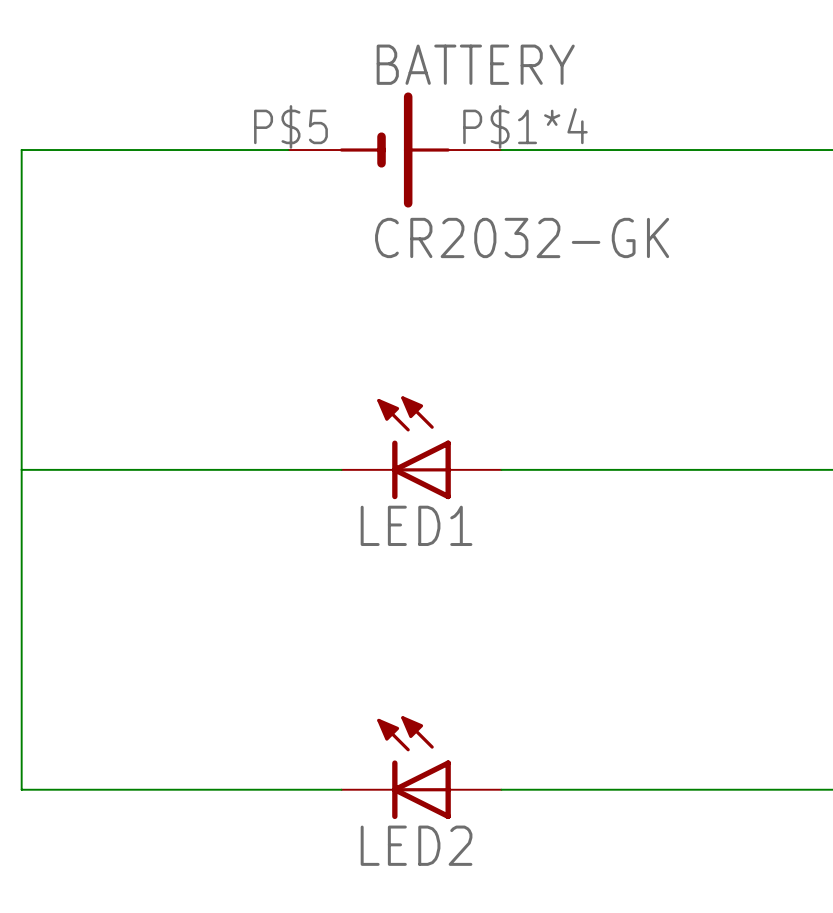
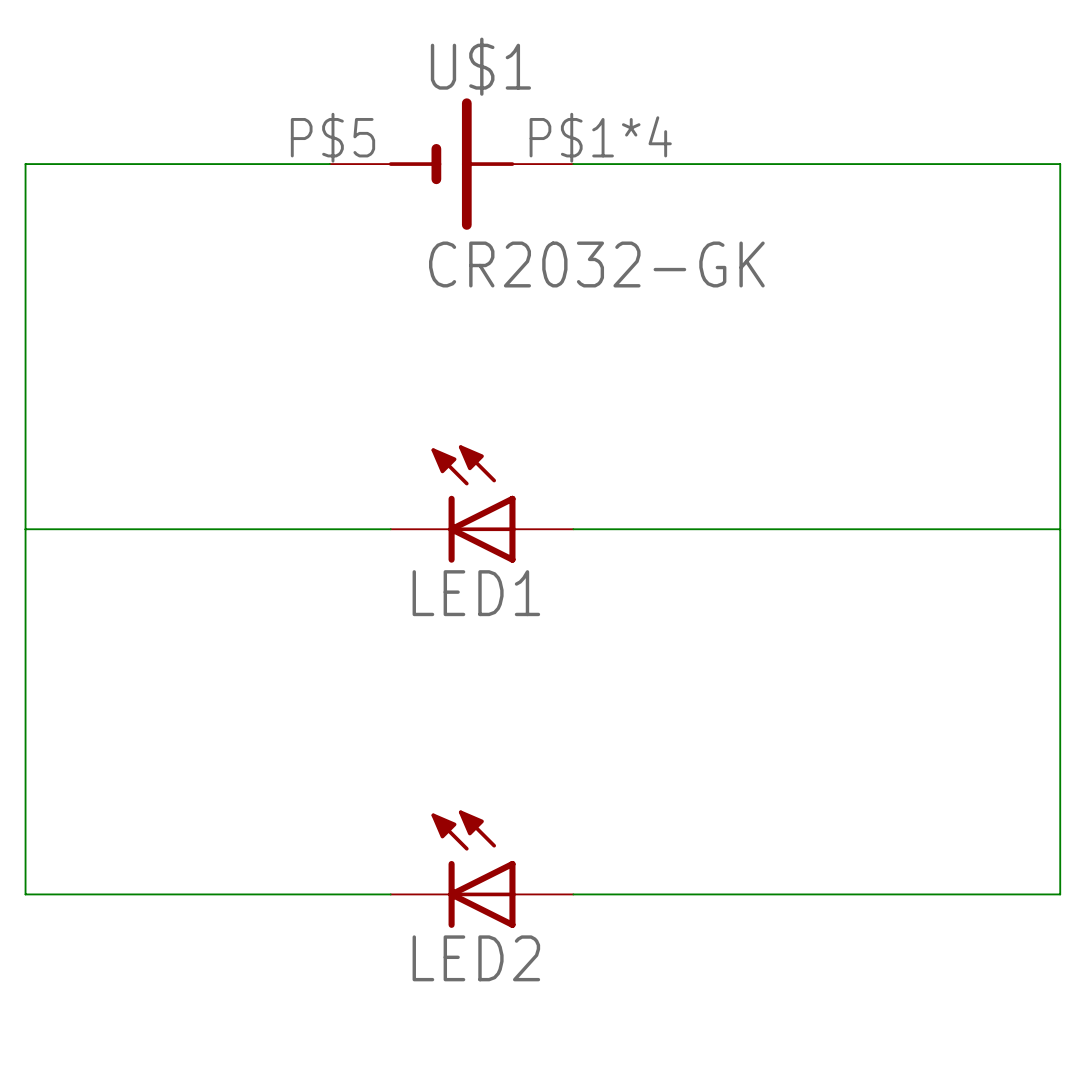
BATTERY name: BATTERY (475, 64) -> U$1 (480, 66)

